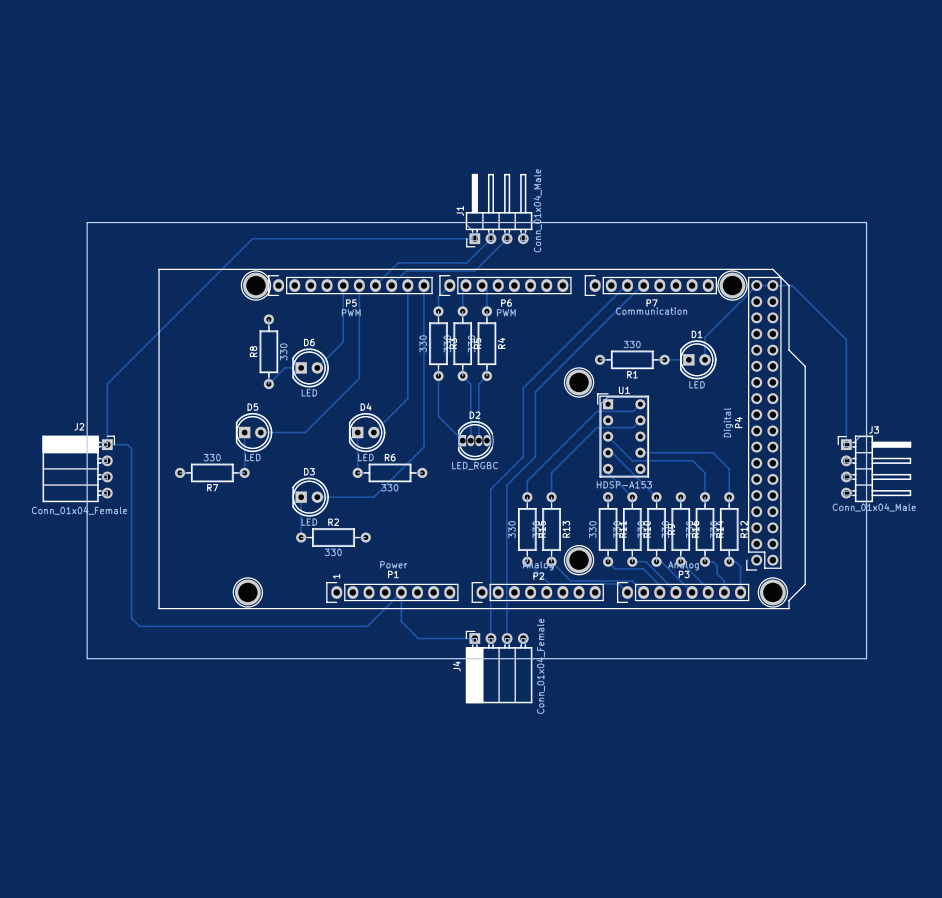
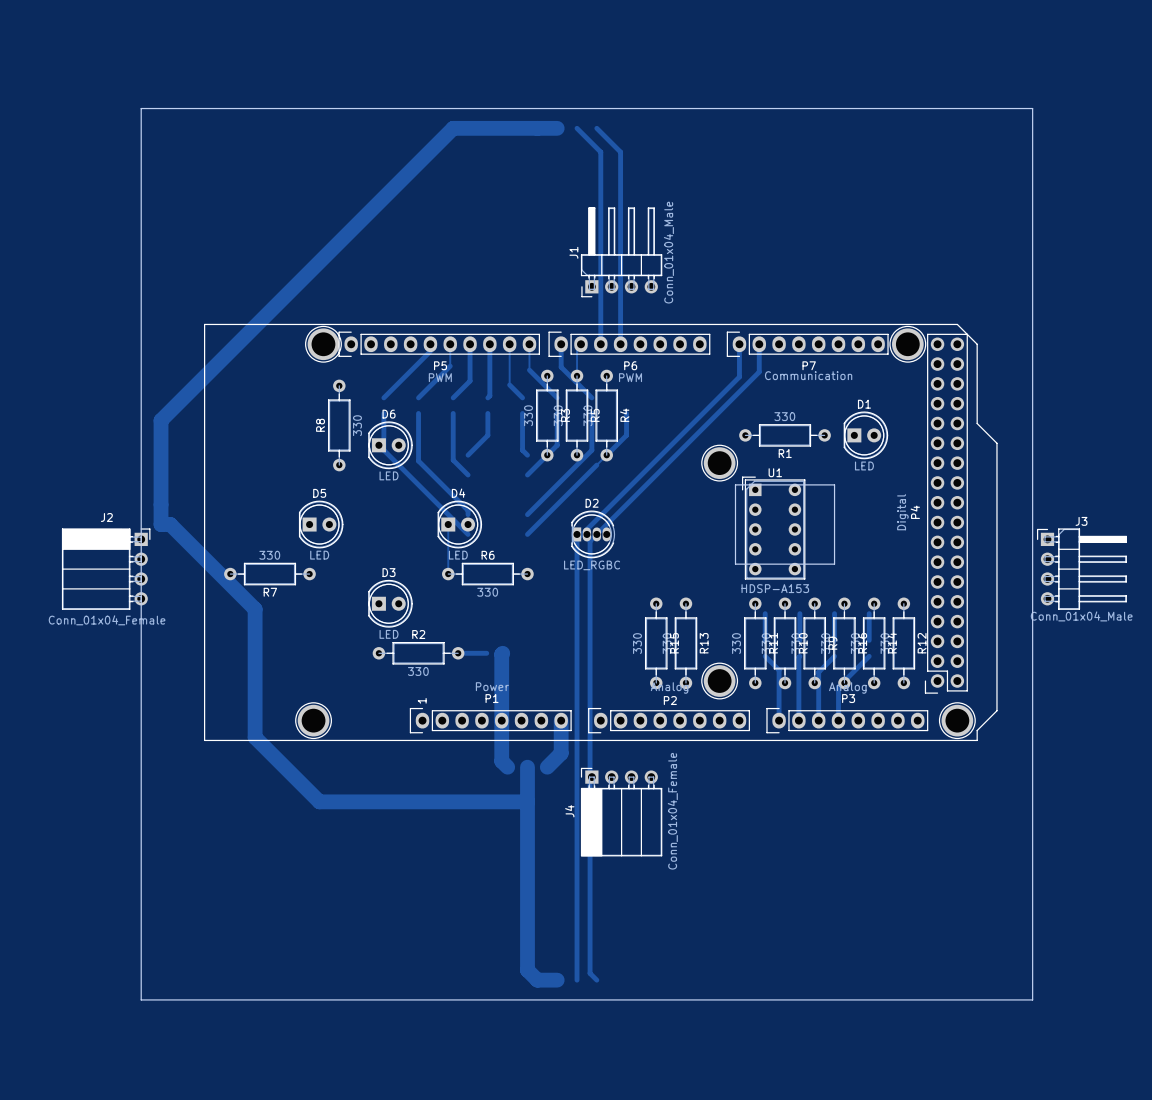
track: none -> (557, 128) (453, 128) (161, 420) (161, 524) (170, 524) (255, 609) (255, 737) (319, 801) (527, 801)
track: none -> (596, 128) (620, 152) (620, 344)
board edge: (87, 222) (87, 658) (866, 658) (866, 222) (87, 222) -> (141, 108) (141, 999) (1032, 999) (1032, 108) (141, 108)
track: (474, 238) (252, 238) (107, 384) (107, 444) (127, 444) (131, 448) (131, 618) (139, 626) (367, 626) (401, 592) -> (502, 653) (501, 720)
track: (490, 238) (466, 262) (398, 262) (375, 285) -> (453, 397) (470, 381) (470, 344)
track: (507, 238) (474, 271) (406, 271) (391, 285) -> (487, 397) (489, 395) (489, 344)
track: (449, 285) (438, 296) (438, 311) -> (561, 344) (561, 367) (591, 397)
track: (482, 285) (486, 290) (486, 311) -> (600, 344) (600, 152) (577, 128)
track: none -> (739, 344) (739, 376) (577, 539) (577, 980)
track: none -> (759, 344) (759, 371) (590, 541) (590, 973) (596, 980)
track: (627, 285) (523, 388) (523, 456) (490, 489) (490, 638) -> none
track: (643, 285) (535, 392) (535, 456) (506, 485) (507, 638) -> none
track: (343, 291) (343, 342) (317, 367) -> (430, 351) (383, 397)
track: (359, 303) (359, 378) (305, 432) (260, 432) -> (450, 366) (418, 397)
track: (423, 306) (423, 447) (373, 497) (317, 497) -> (529, 370) (557, 397)
track: (407, 318) (407, 398) (373, 432) -> (509, 384) (522, 397)
track: none -> (383, 413) (383, 450) (468, 534)
track: none -> (418, 413) (418, 461) (468, 510) (468, 514)
track: none -> (453, 413) (453, 460) (468, 475)
track: none -> (487, 413) (487, 435) (468, 455)
track: none -> (522, 413) (522, 450) (527, 455)
track: none -> (557, 413) (557, 445) (527, 475)
track: none -> (591, 413) (591, 450) (527, 514)
track: none -> (626, 413) (626, 435) (606, 455)
track: (664, 359) (688, 359) -> none
track: (705, 359) (705, 337) (756, 285) (792, 285) (846, 339) (846, 444) -> none
track: (301, 367) (285, 367) (268, 384) -> none
track: (438, 376) (438, 416) (462, 440) -> none
track: (462, 376) (470, 384) (470, 440) -> none
track: (478, 384) (478, 440) -> (596, 465) (527, 534)
board edge: none -> (735, 484) (735, 564) (834, 564) (834, 484) (735, 484)
track: (640, 404) (633, 411) (596, 411) (527, 481) (527, 497) -> none
track: (640, 420) (633, 427) (596, 427) (551, 472) (551, 497) -> none
track: (244, 432) (244, 472) -> none
track: (608, 440) (608, 436) (632, 460) (692, 460) (705, 472) (705, 497) -> none
track: (640, 452) (713, 452) (729, 468) (729, 497) -> none
track: (608, 456) (608, 452) (612, 452) (656, 497) -> none
track: (608, 468) (608, 472) (632, 497) -> none
track: (301, 497) (301, 537) -> none
track: none -> (765, 613) (765, 640)
track: none -> (799, 613) (799, 640)
track: none -> (834, 613) (834, 640)
track: none -> (869, 613) (869, 640)
track: none -> (463, 653) (486, 653)
track: (527, 561) (549, 583) (618, 583) (627, 592) -> (765, 656) (779, 670) (779, 720)
track: (551, 561) (570, 581) (632, 581) (643, 592) -> (799, 656) (798, 720)
track: (608, 561) (615, 568) (643, 568) (659, 585) -> (834, 656) (818, 672) (818, 711)
track: (632, 561) (645, 561) (673, 589) (675, 589) -> (869, 656) (838, 687) (838, 716)
track: (656, 561) (661, 561) (692, 592) -> none
track: (680, 561) (708, 589) (708, 592) -> none
track: (705, 561) (713, 561) (717, 565) (717, 573) (724, 581) (724, 589) -> none
track: (729, 561) (735, 561) (740, 566) (740, 592) -> none
track width: thin (401, 592) (401, 621) -> thick (501, 720) (501, 756)
track: none -> (561, 720) (561, 753) (547, 767)
track: (401, 621) (418, 638) (474, 638) -> (501, 756) (501, 761) (507, 767)
track: none -> (527, 767) (527, 970) (537, 980) (557, 980)

